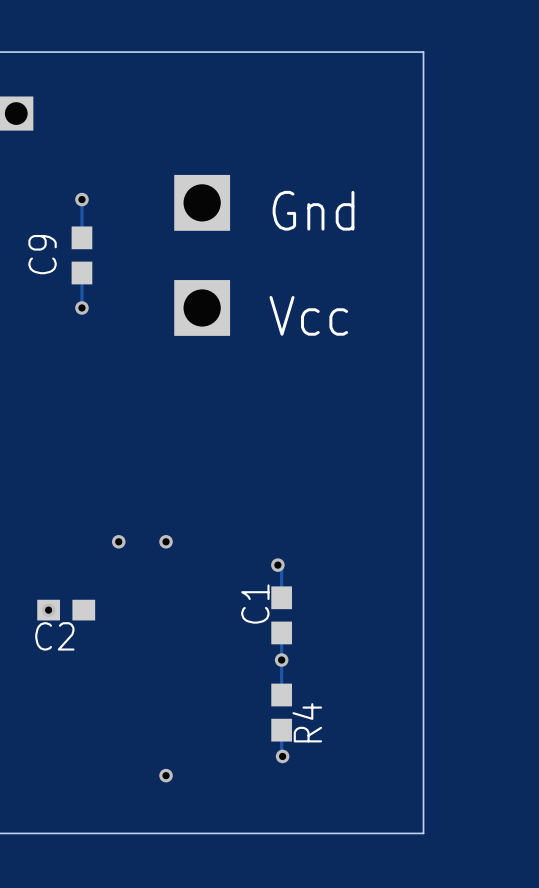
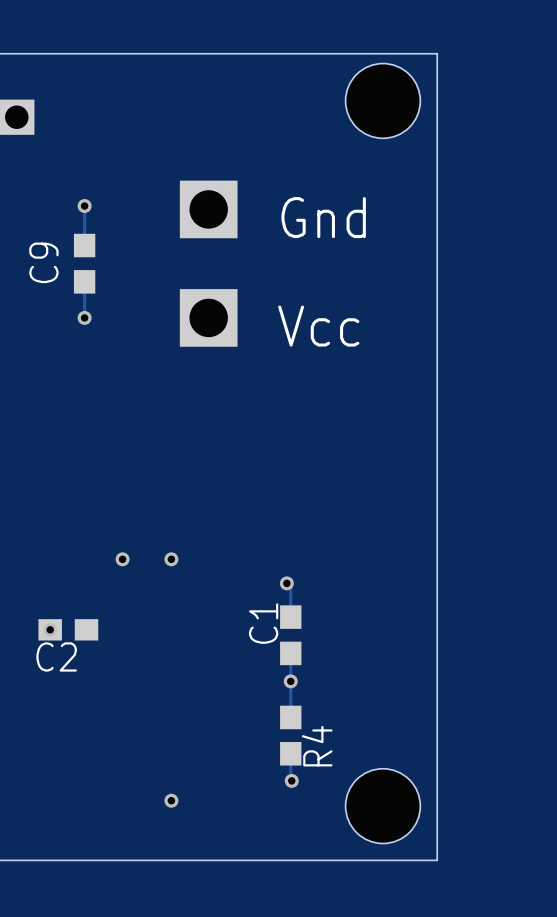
hole: none -> (382, 100)
hole: none -> (382, 806)

